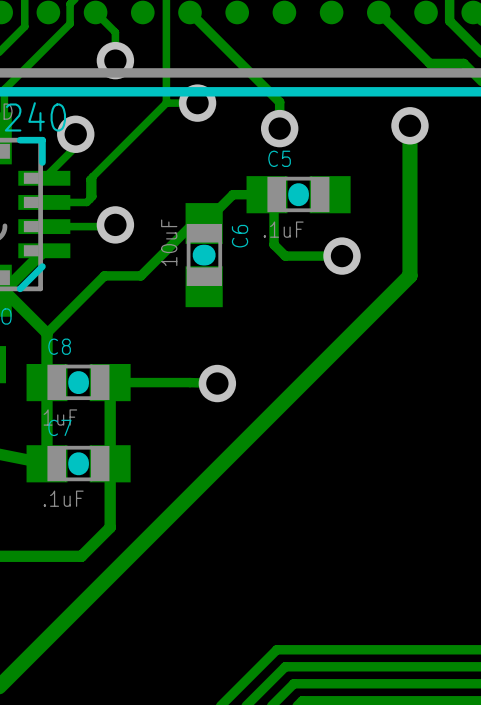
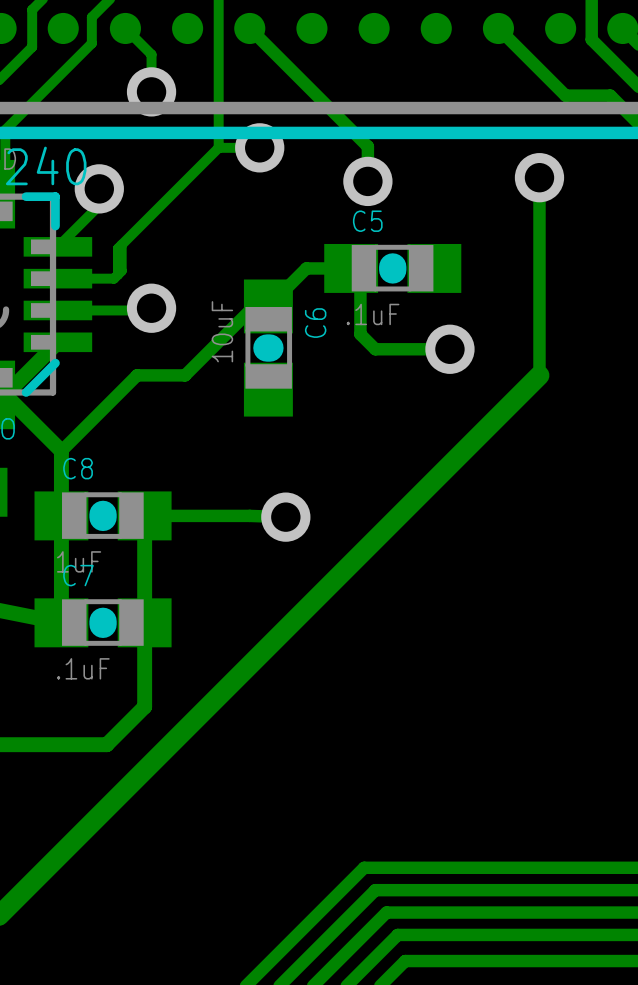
track width: thick (409, 125) (409, 275) -> thin (539, 177) (539, 375)

